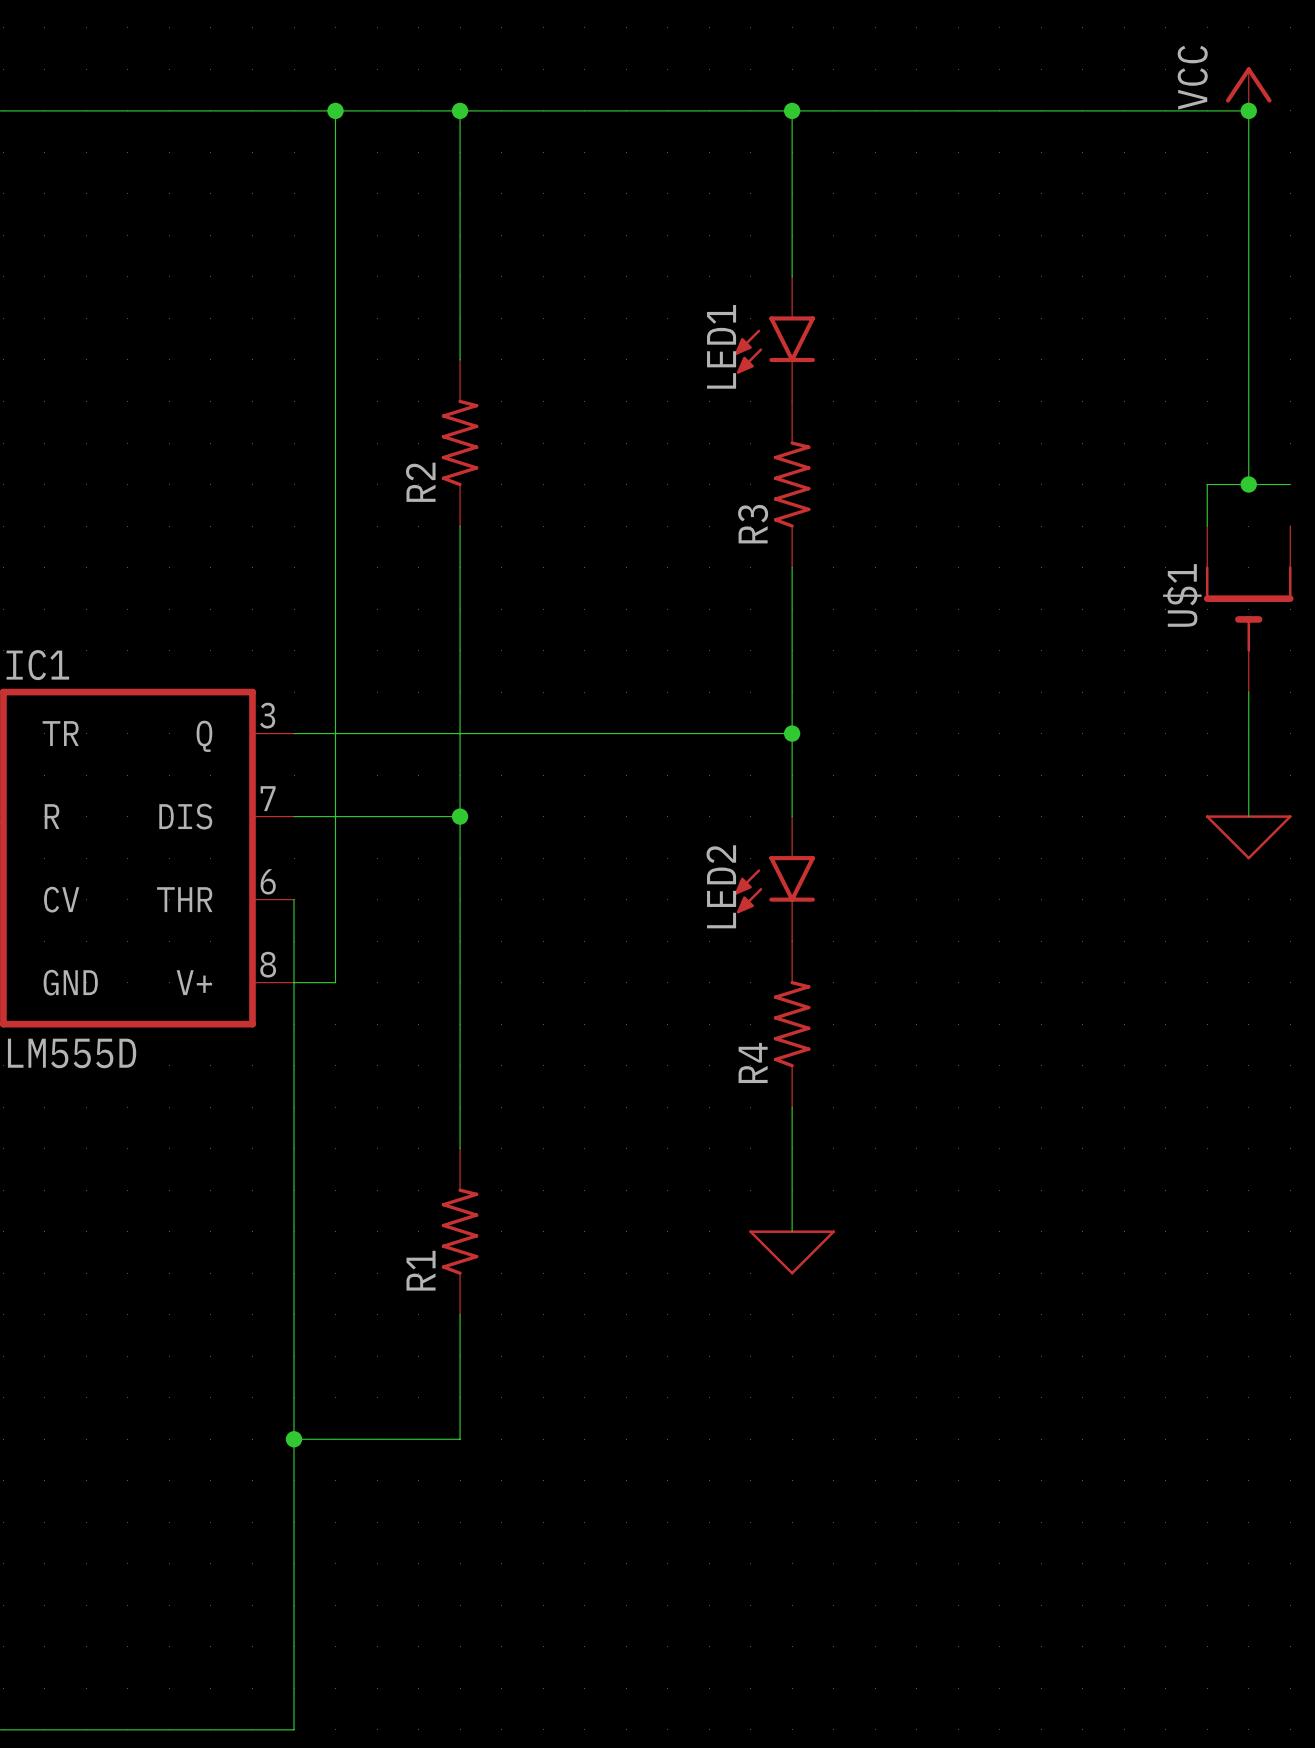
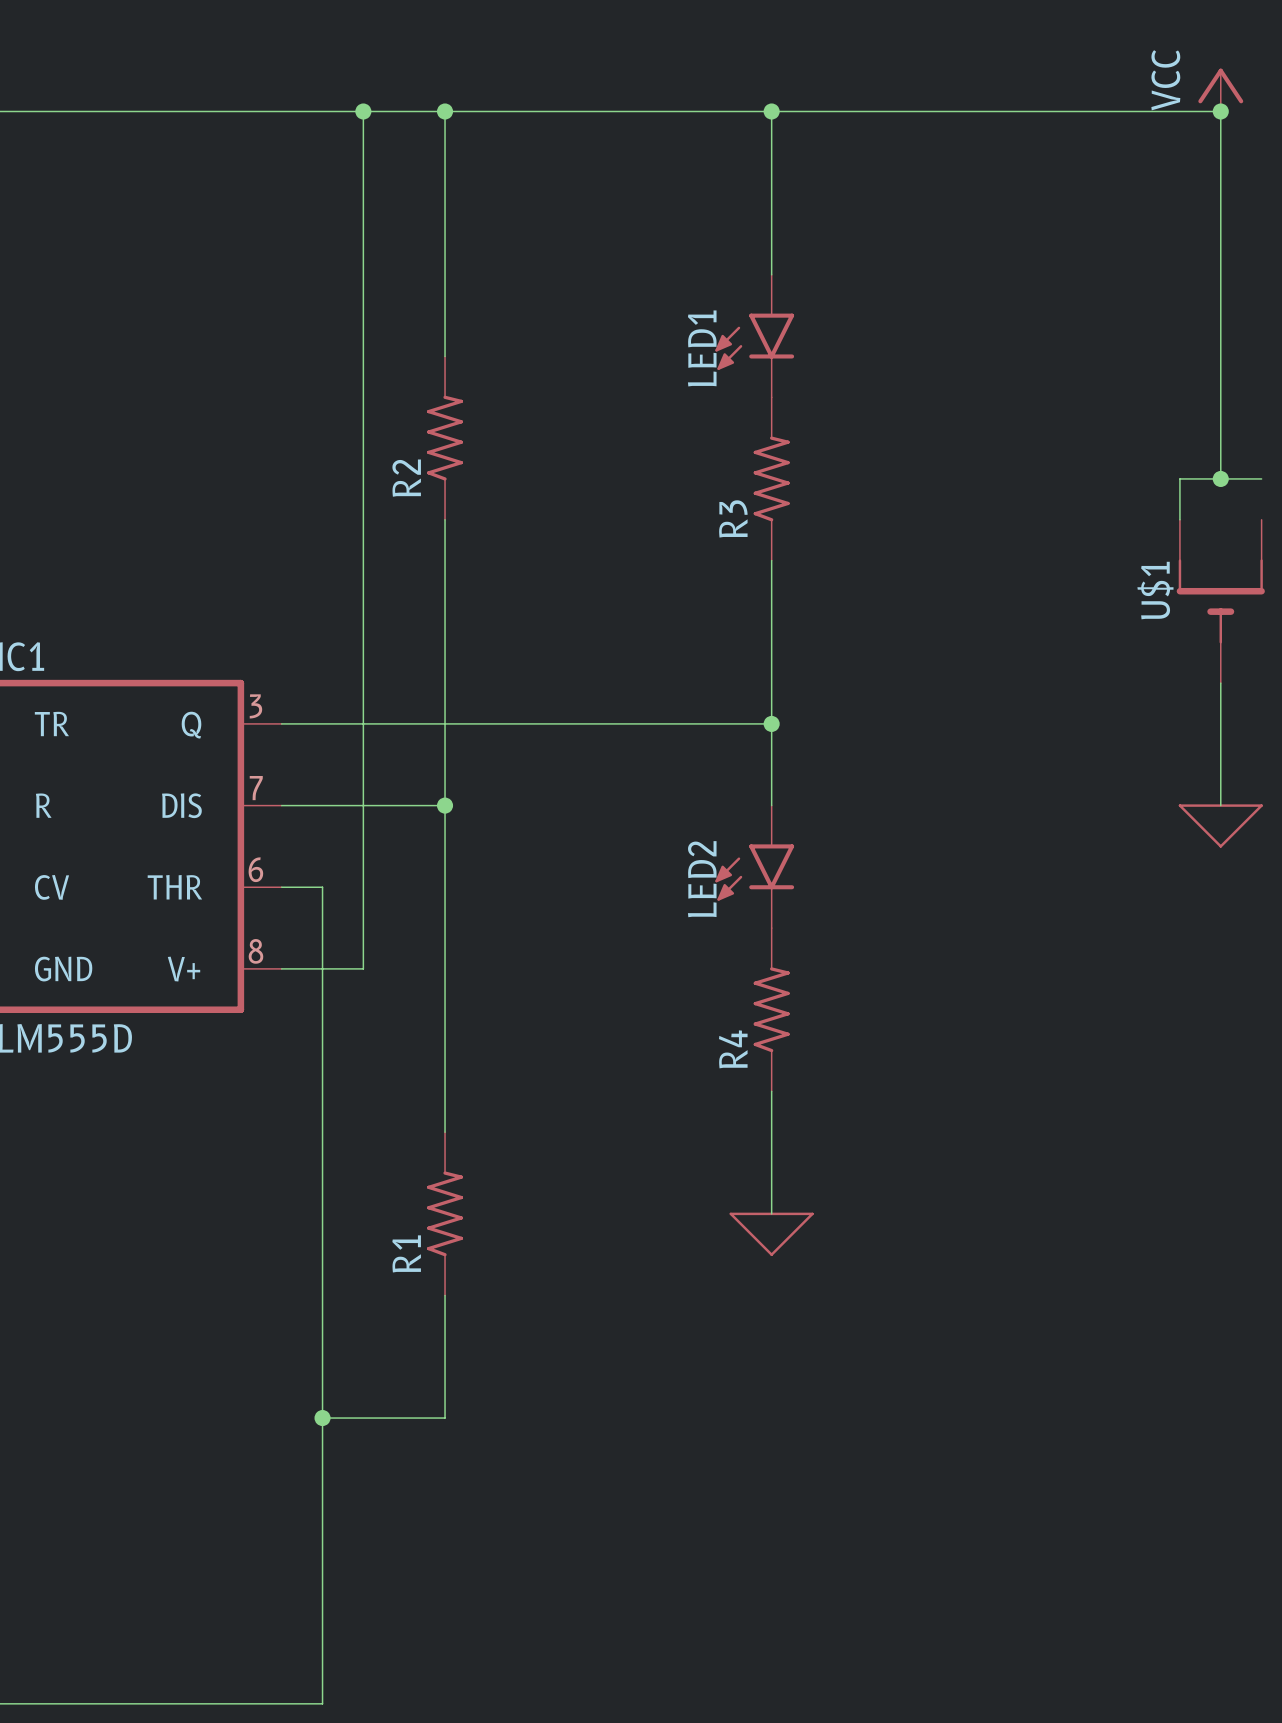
wire: (335, 110) (335, 899) -> (281, 887) (322, 887)
junction position: (335, 110) -> (363, 111)
wire: (294, 899) (294, 1729) -> (363, 111) (363, 968) (322, 968) (322, 1703) (281, 1703)
wire: (294, 1439) (335, 1439) -> none
junction position: (294, 1439) -> (322, 1418)

